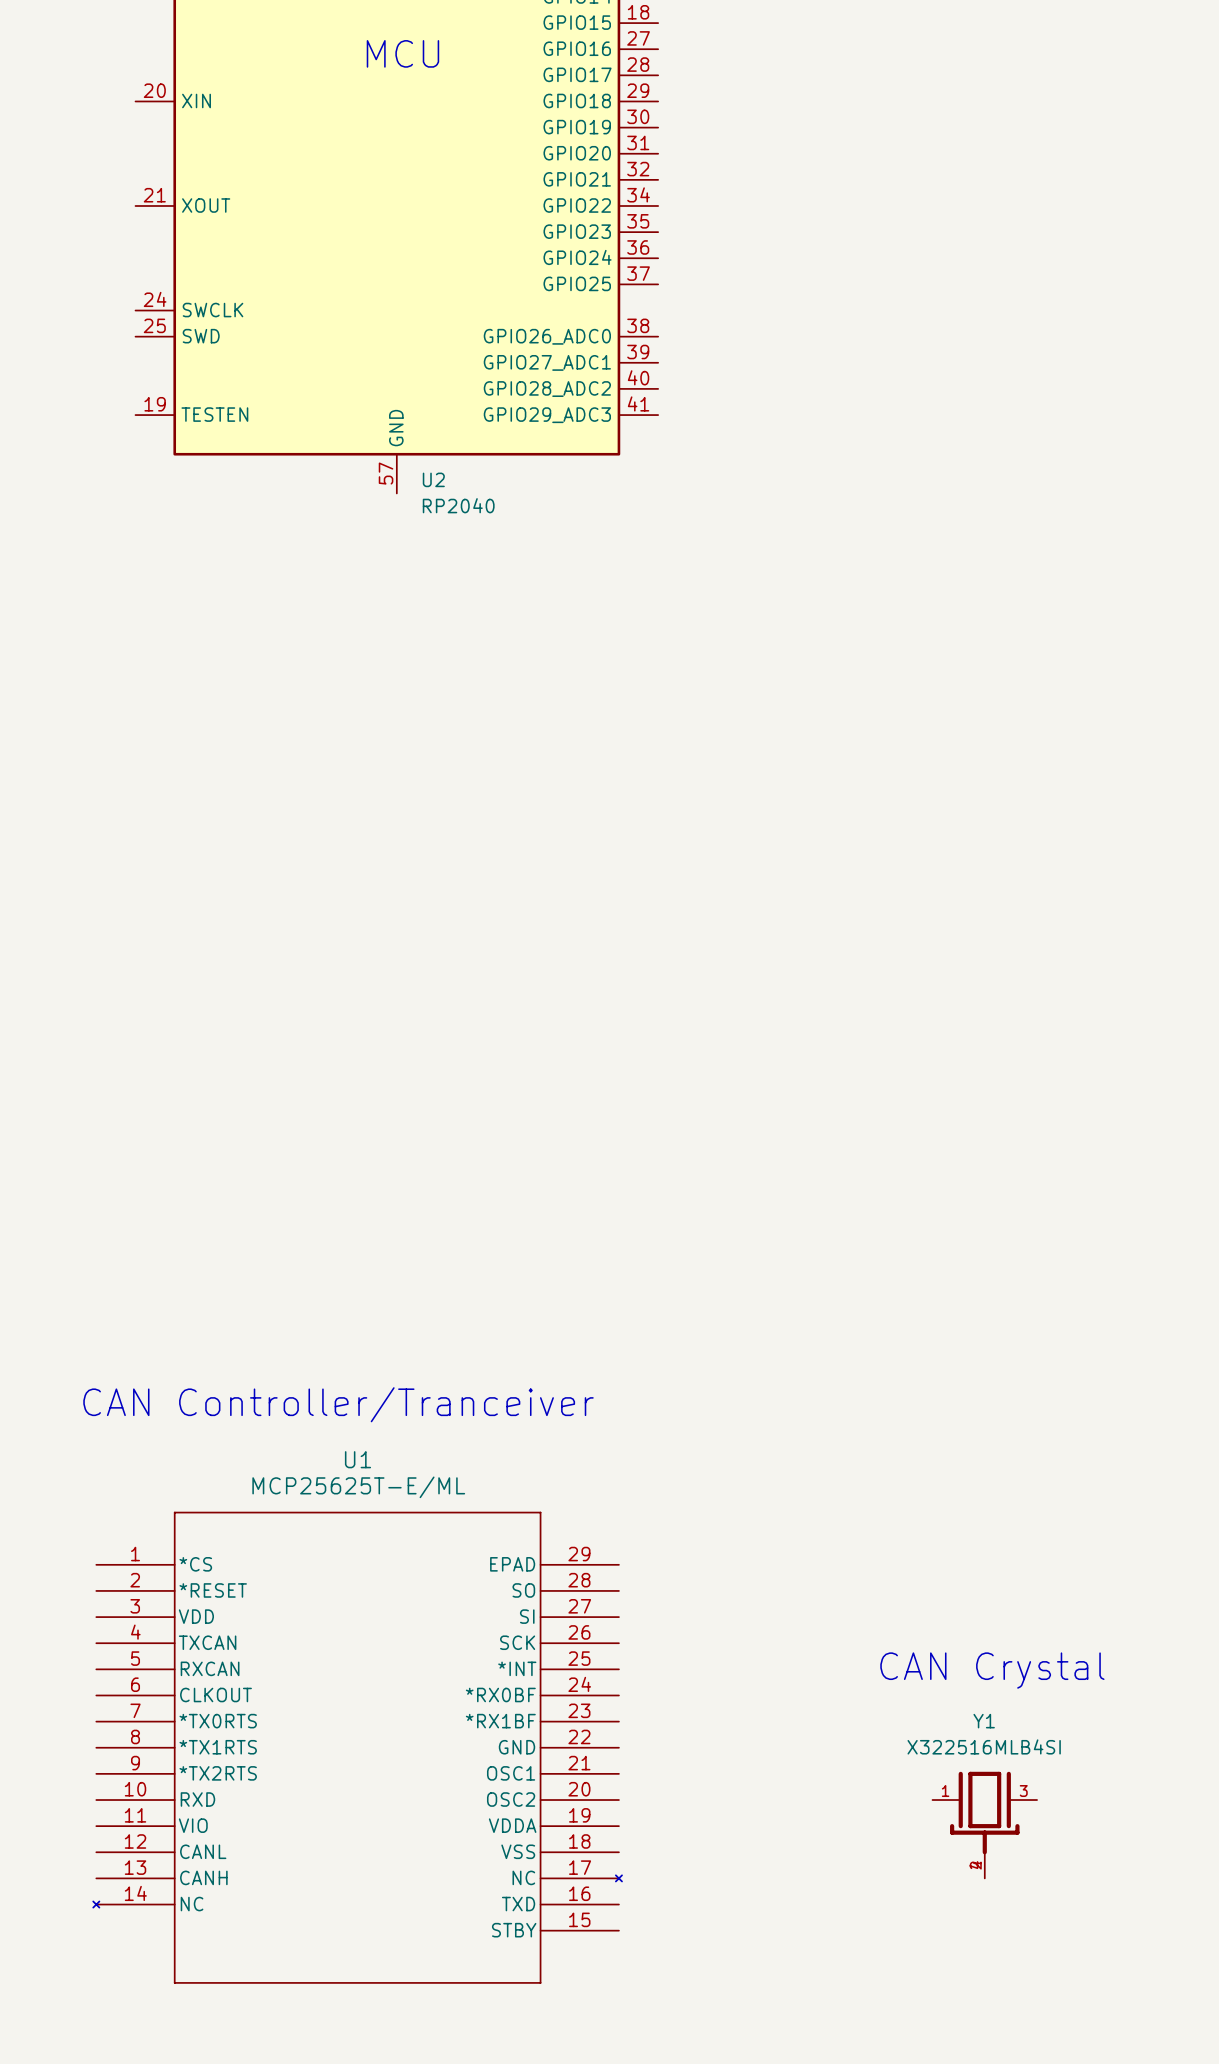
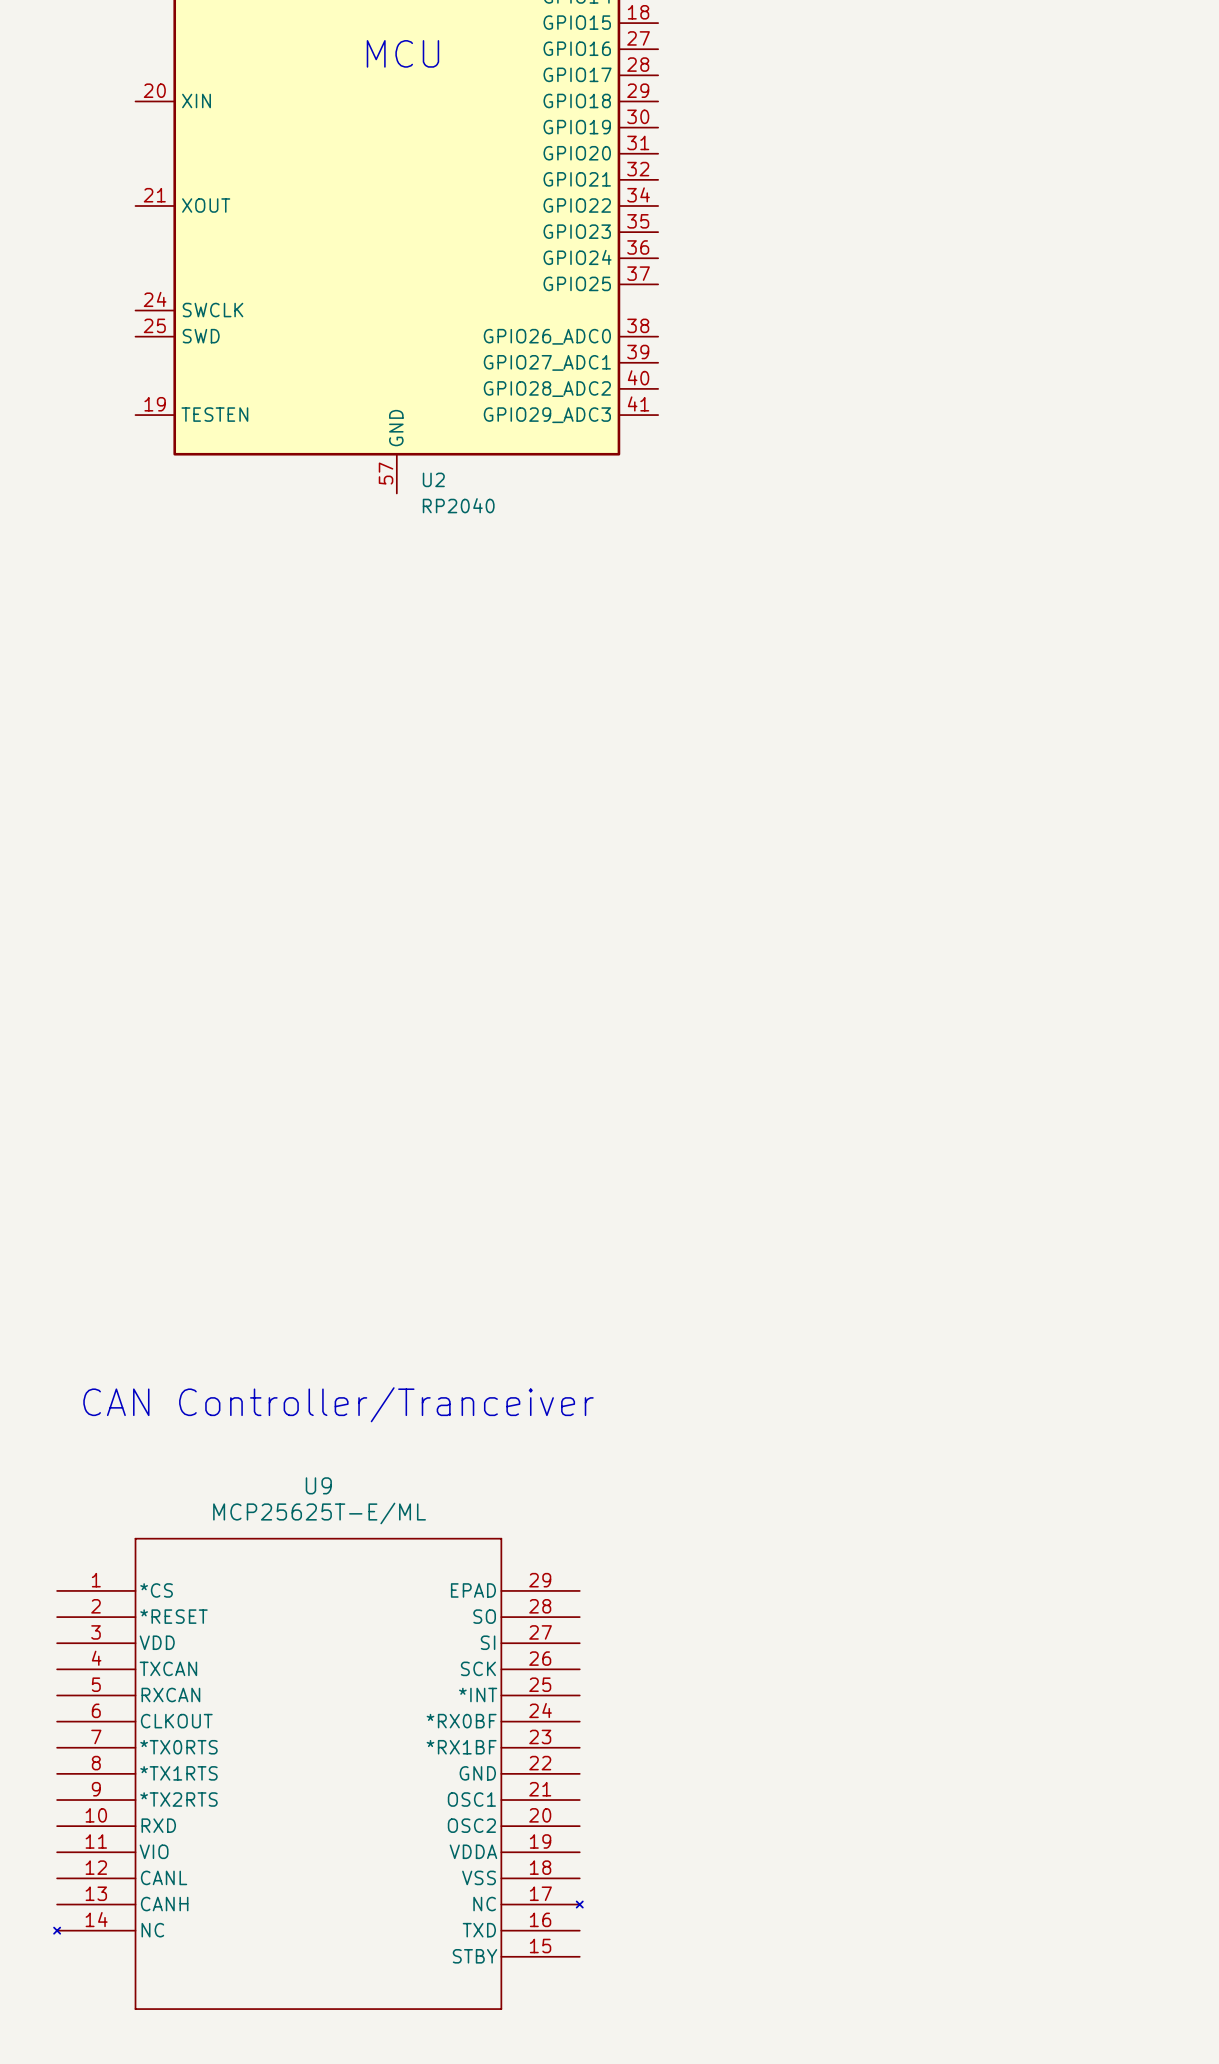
text: CAN Crystal (992, 1670) -> none
U1: MCP25625T-E/ML (357, 1747) -> none
U9: none -> MCP25625T-E/ML (318, 1773)
Y1: X322516MLB4SI (984, 1825) -> none

